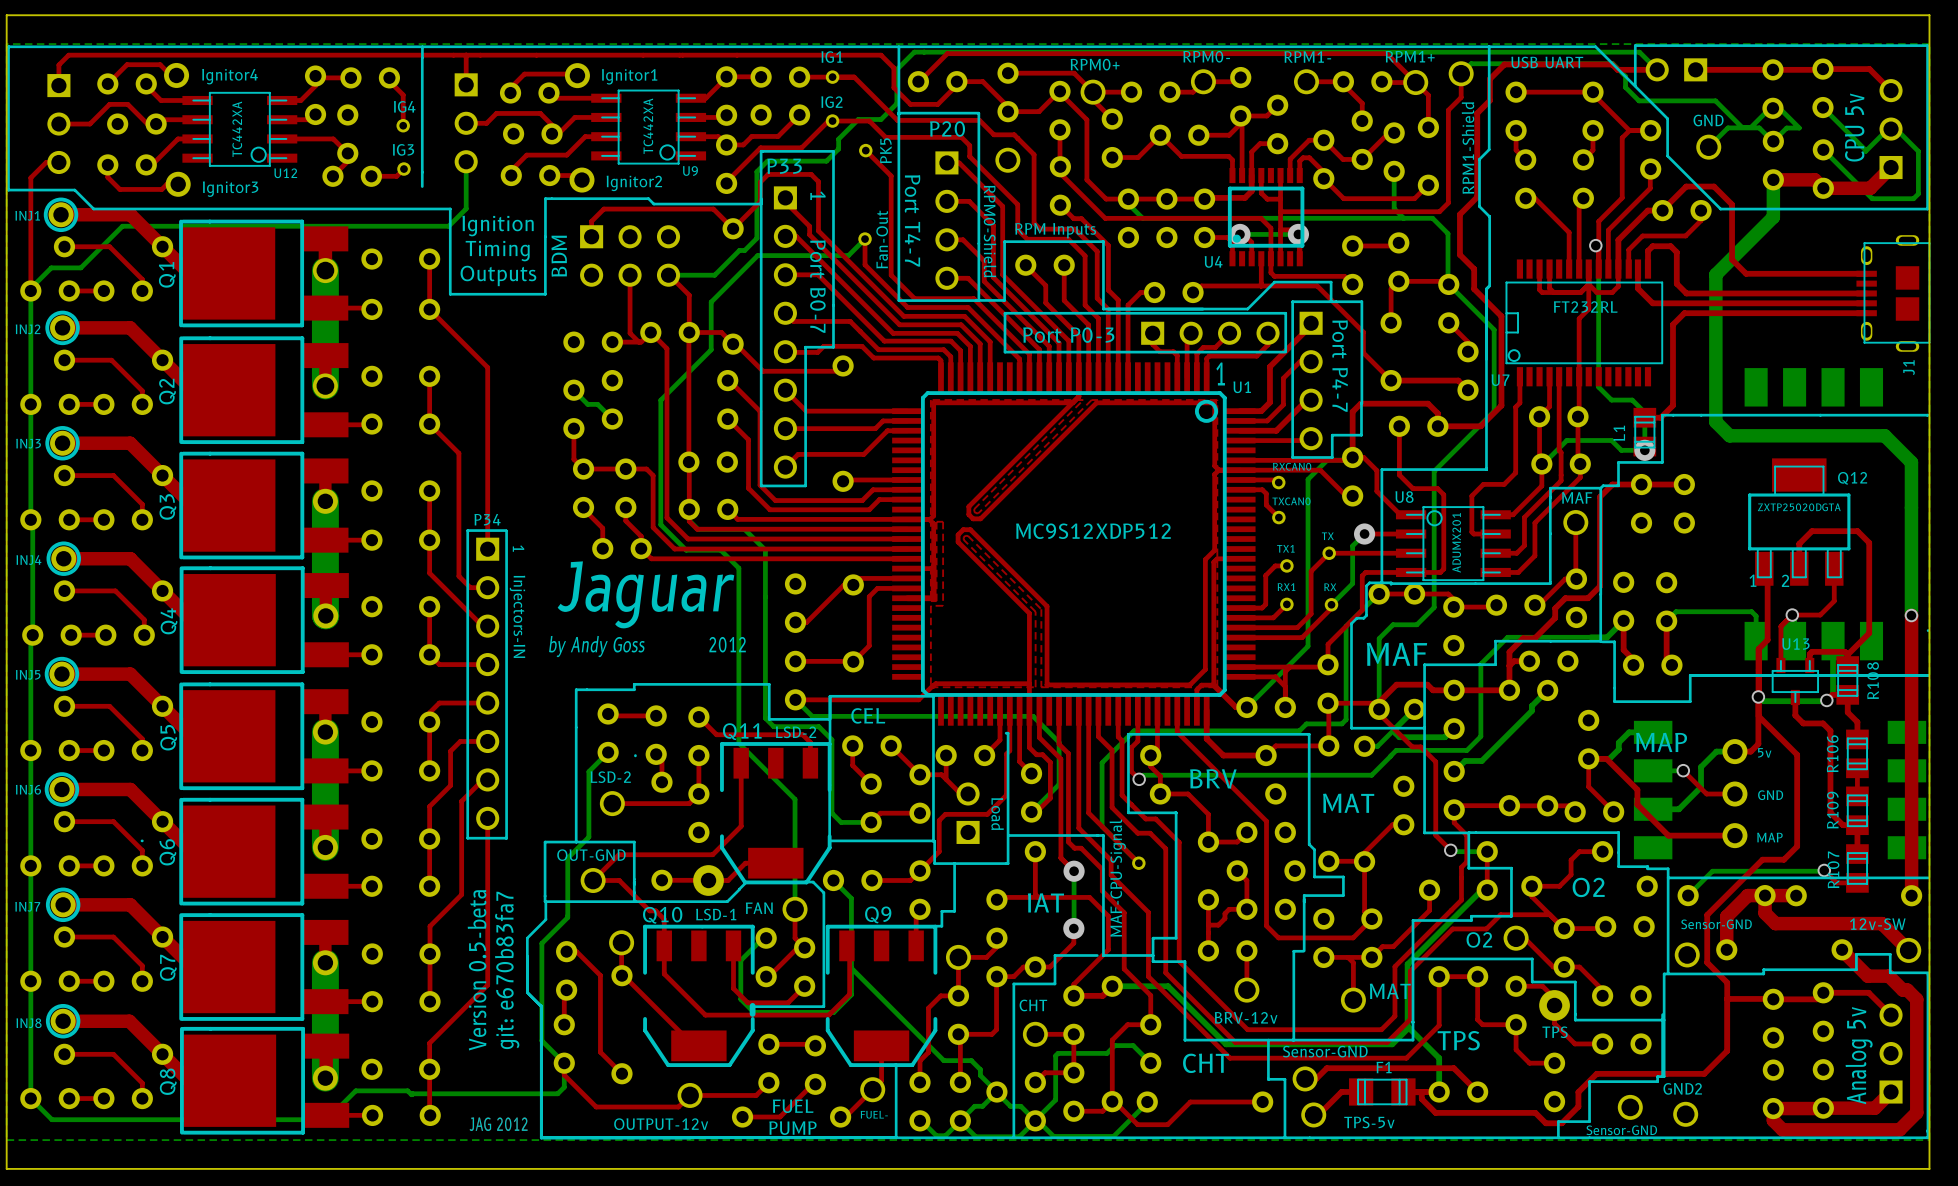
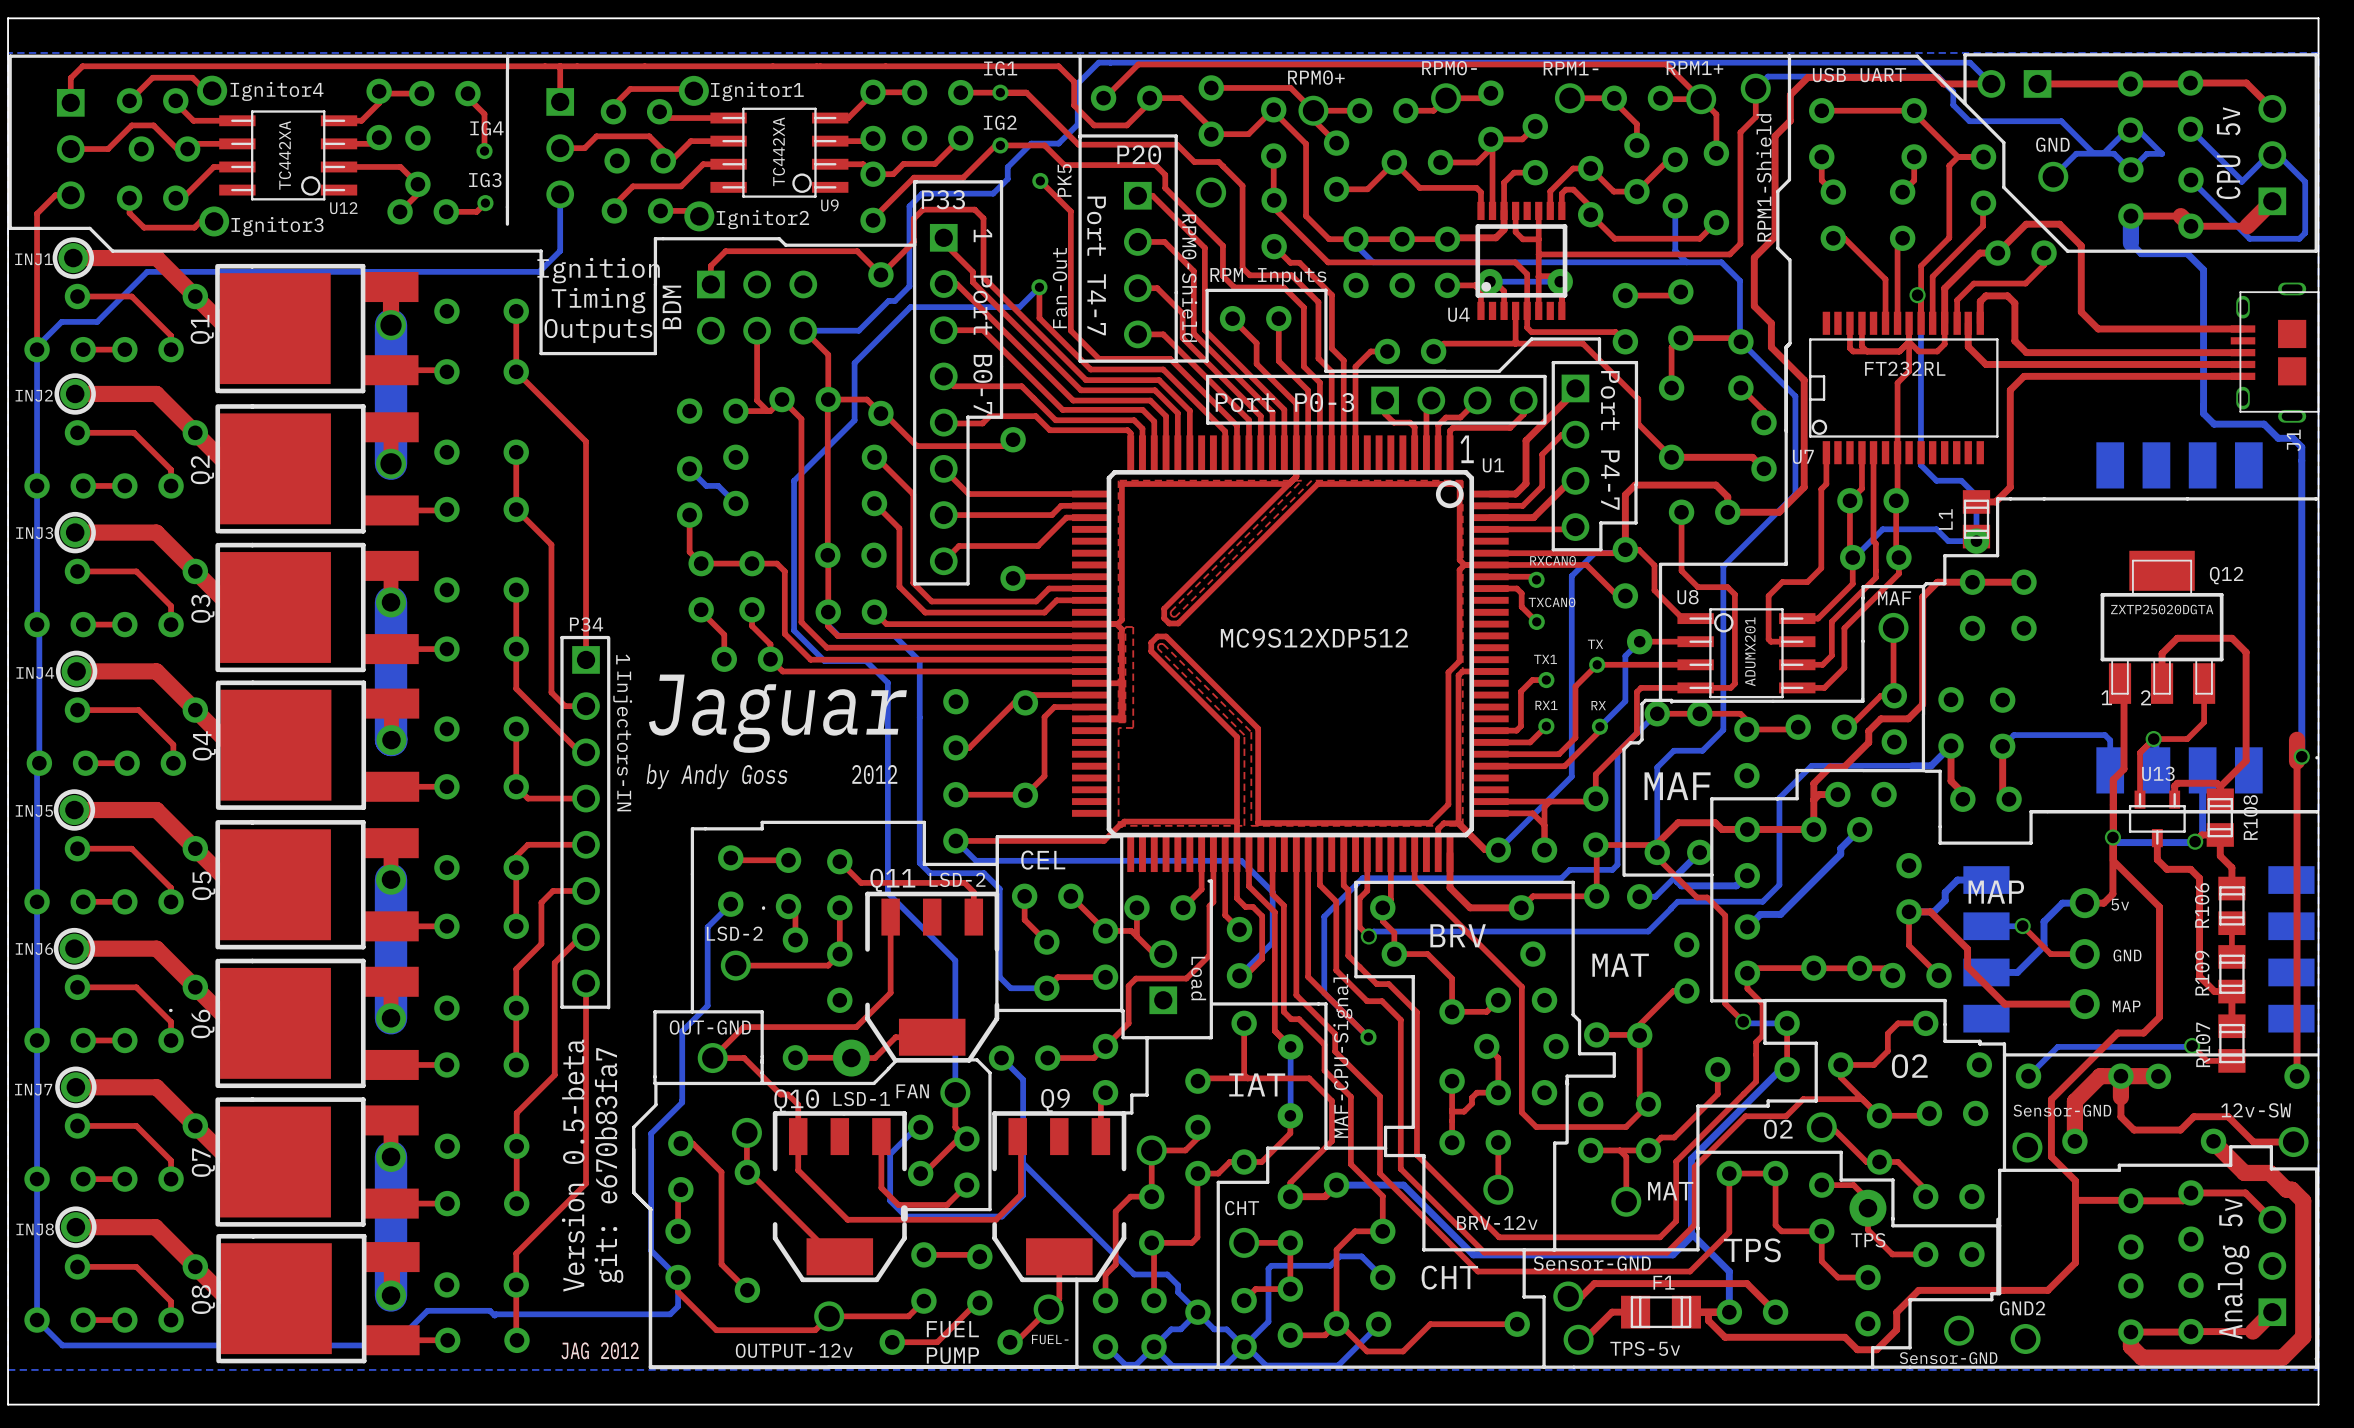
top track width: thick (1773, 179) (1814, 179) -> thin (2130, 216) (2180, 216)
top track width: thick (1823, 188) (1870, 188) -> thin (2190, 226) (2247, 226)
bottom track: (1773, 202) (1773, 217) (1715, 274) (1715, 421) (1729, 435) (1884, 435) (1911, 462) (1911, 615) -> (2130, 243) (2141, 253) (2187, 253) (2203, 269) (2203, 413) (2214, 424) (2264, 424) (2278, 438) (2293, 438) (2301, 447) (2301, 756)
via position: (1911, 615) -> (2301, 756)
top track width: thick (1911, 633) (1911, 895) -> thin (2297, 761) (2297, 1076)
top track: (1765, 913) (1775, 923) (1881, 923) (1908, 950) -> (2120, 1097) (2120, 1116) (2134, 1130) (2180, 1130) (2193, 1116) (2228, 1116) (2253, 1142) (2293, 1142)
top track width: thick (1773, 1108) (1822, 1108) -> thin (2130, 1332) (2190, 1332)
top track width: thick (1823, 1108) (1874, 1108) -> thin (2190, 1331) (2252, 1331)

